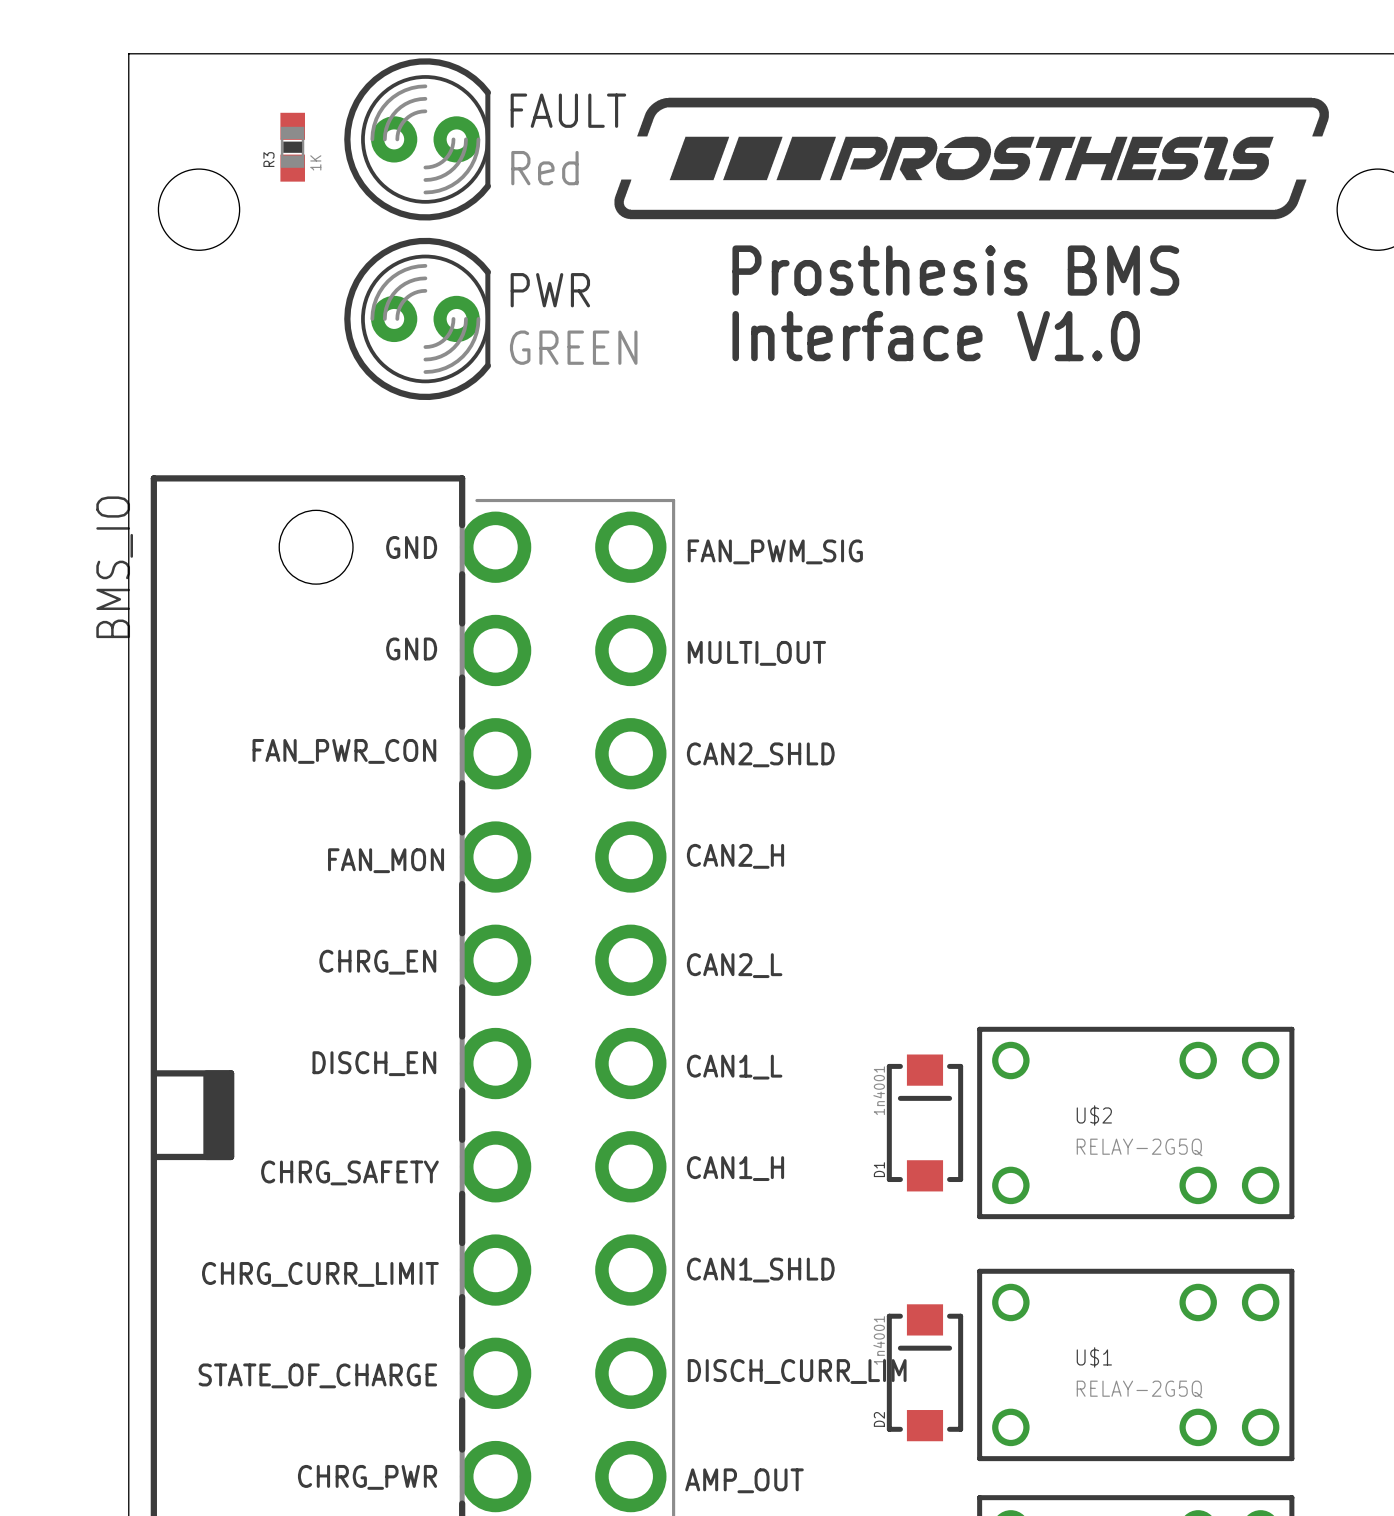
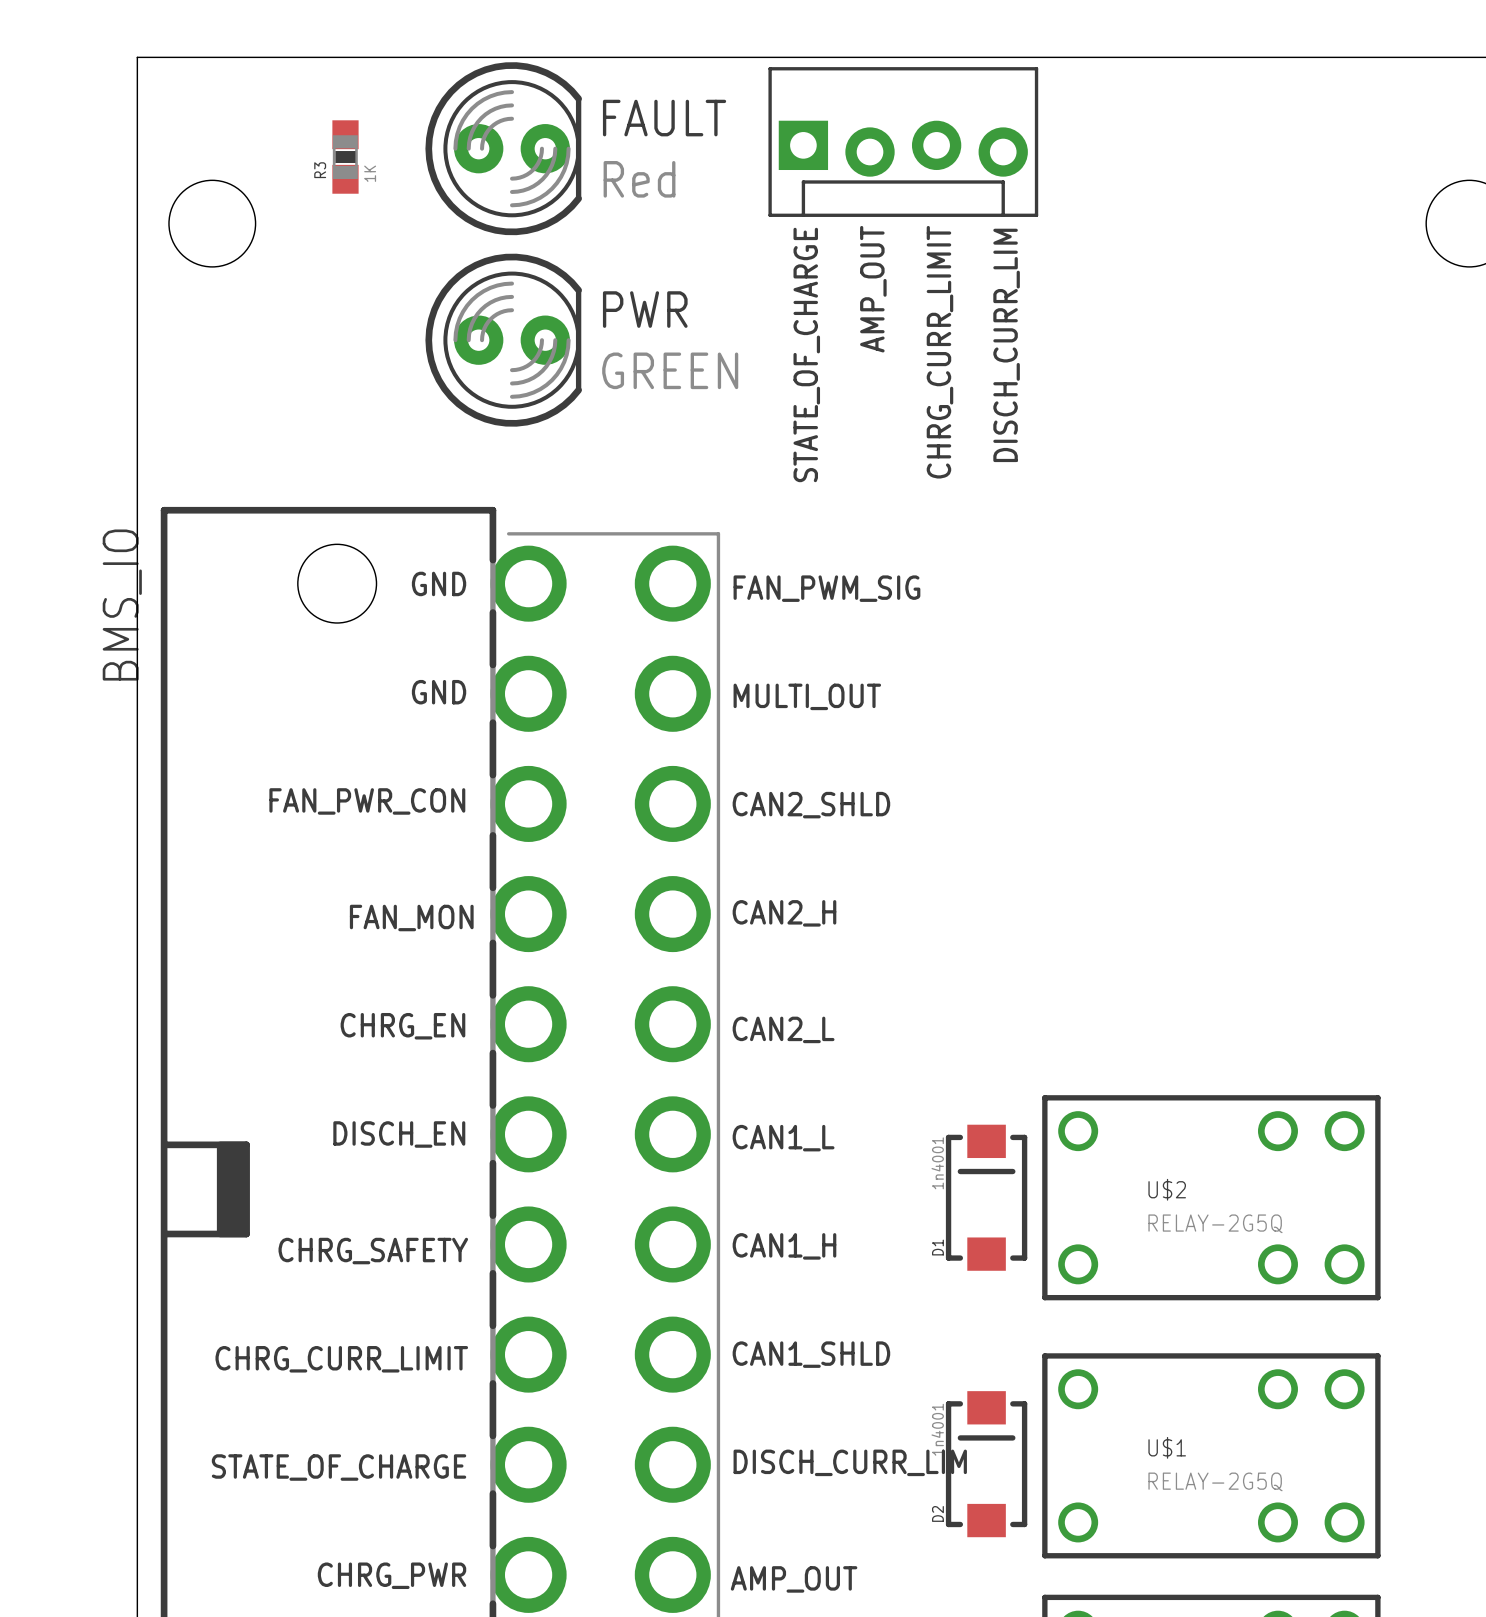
drawing: [614, 97, 1329, 220] -> none
part: none -> (903, 142)
FAULT position: (417, 139) -> (503, 148)
R3 position: (292, 147) -> (345, 157)
text: Prosthesis BMS (955, 270) -> none
text: none -> AMP_OUT (873, 289)
PWR position: (417, 318) -> (503, 340)
text: none -> DISCH_CURR_LIM (1006, 345)
text: none -> CHRG_CURR_LIMIT (939, 352)
text: none -> STATE_OF_CHARGE (806, 354)
text: Interface V1.0 (936, 336) -> none

